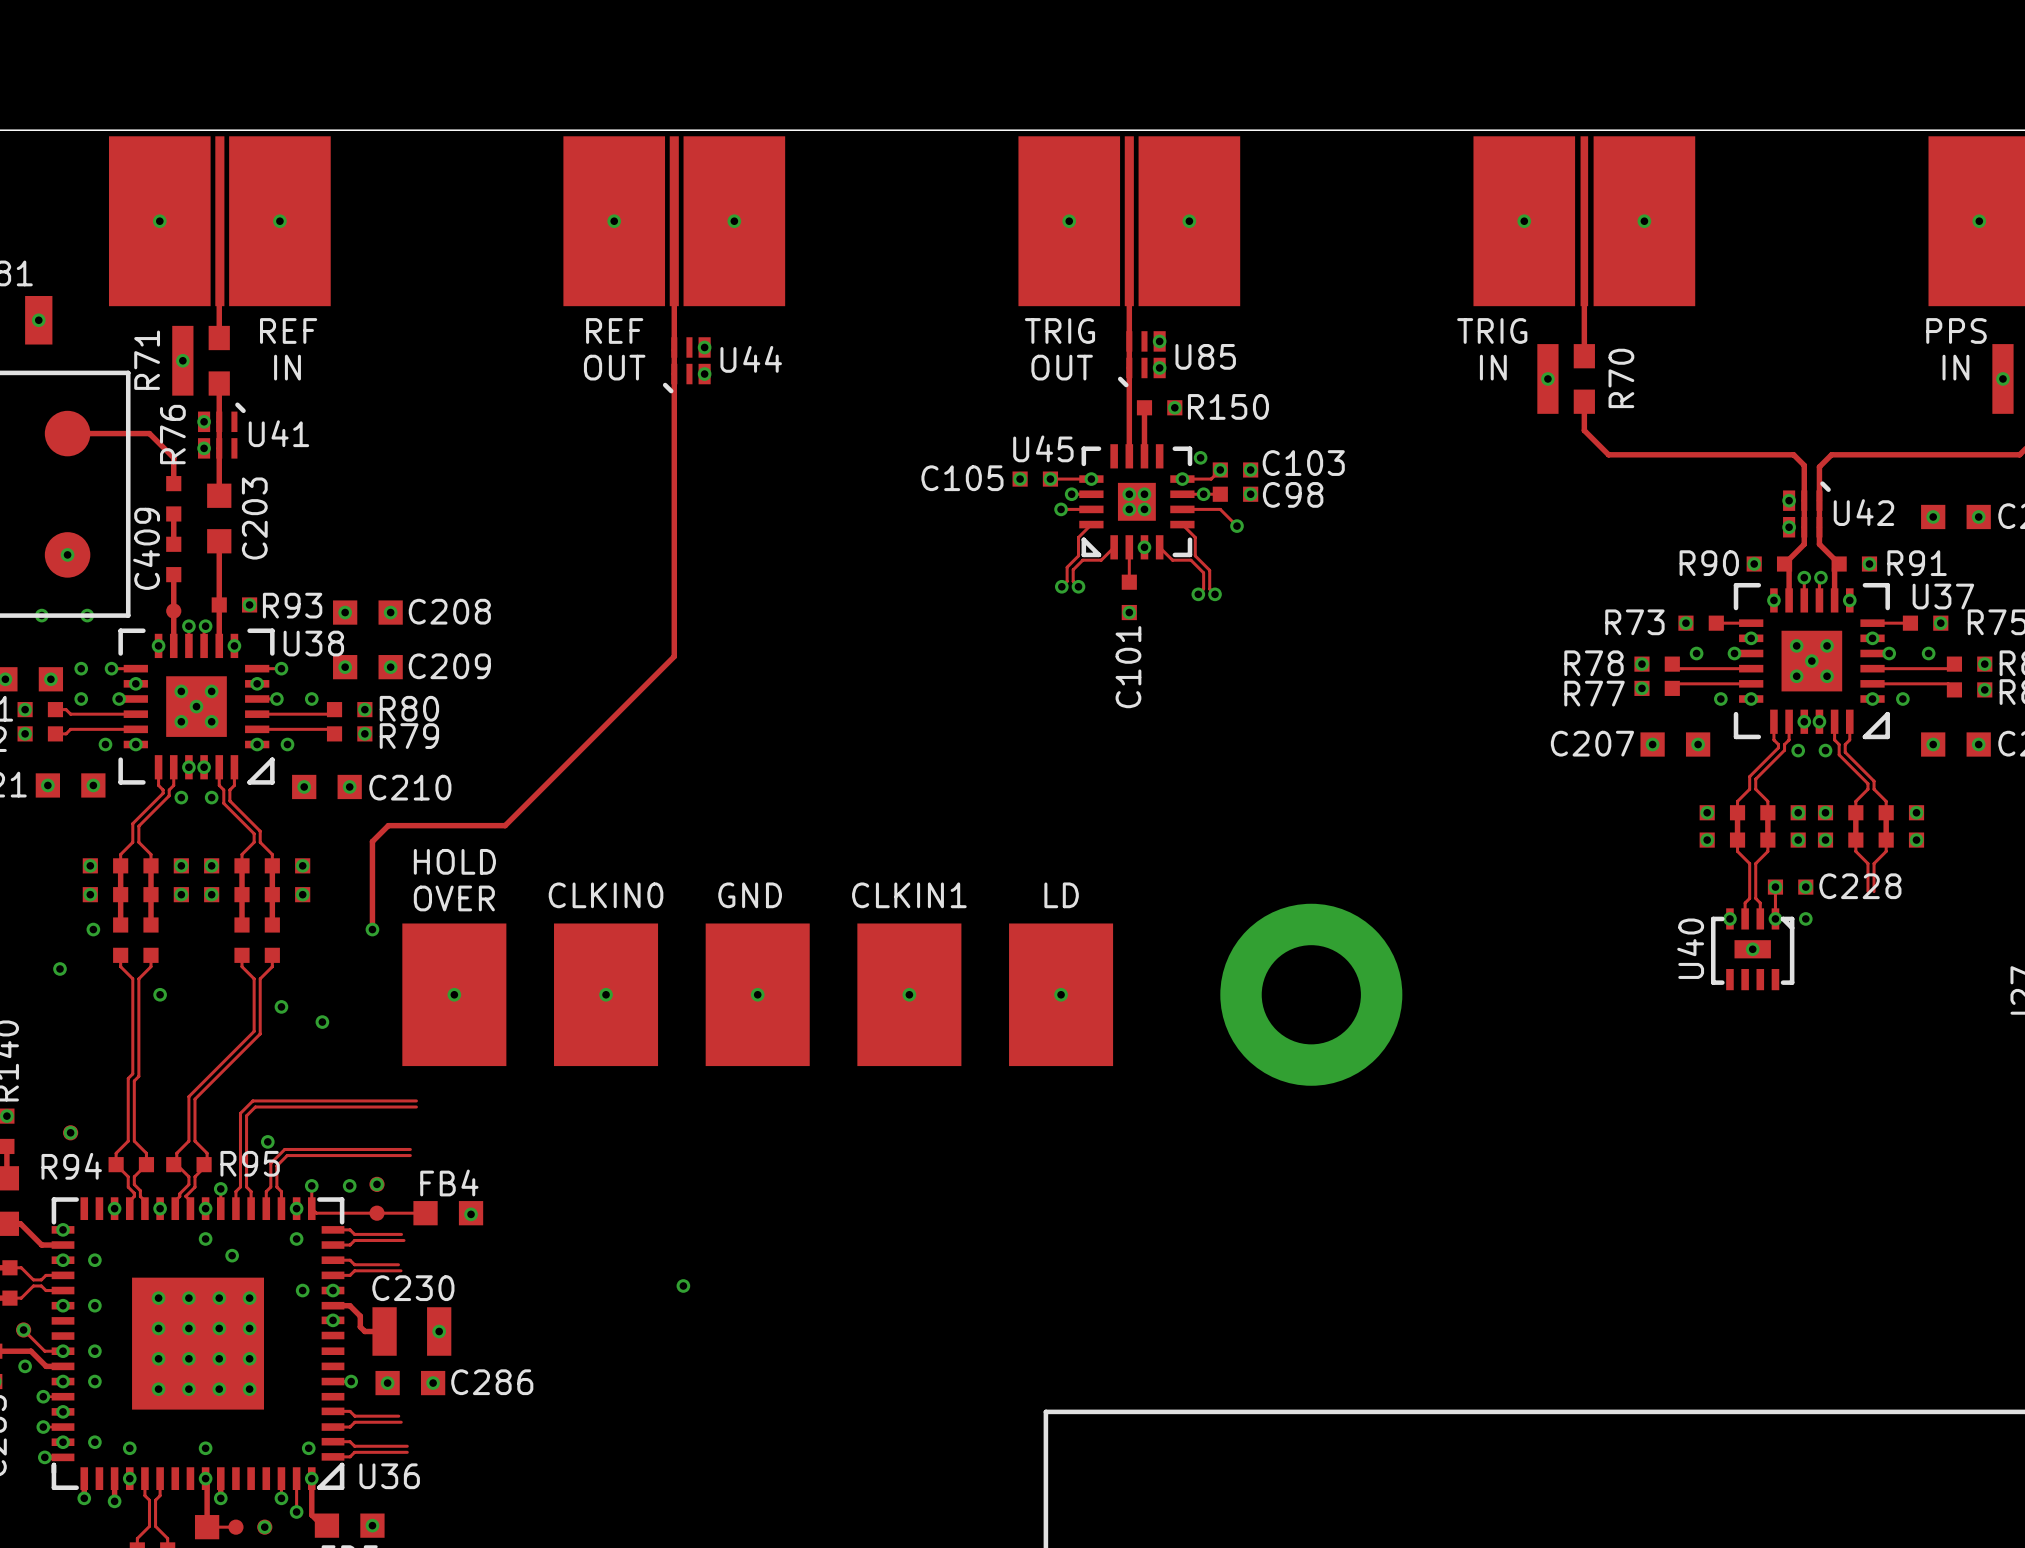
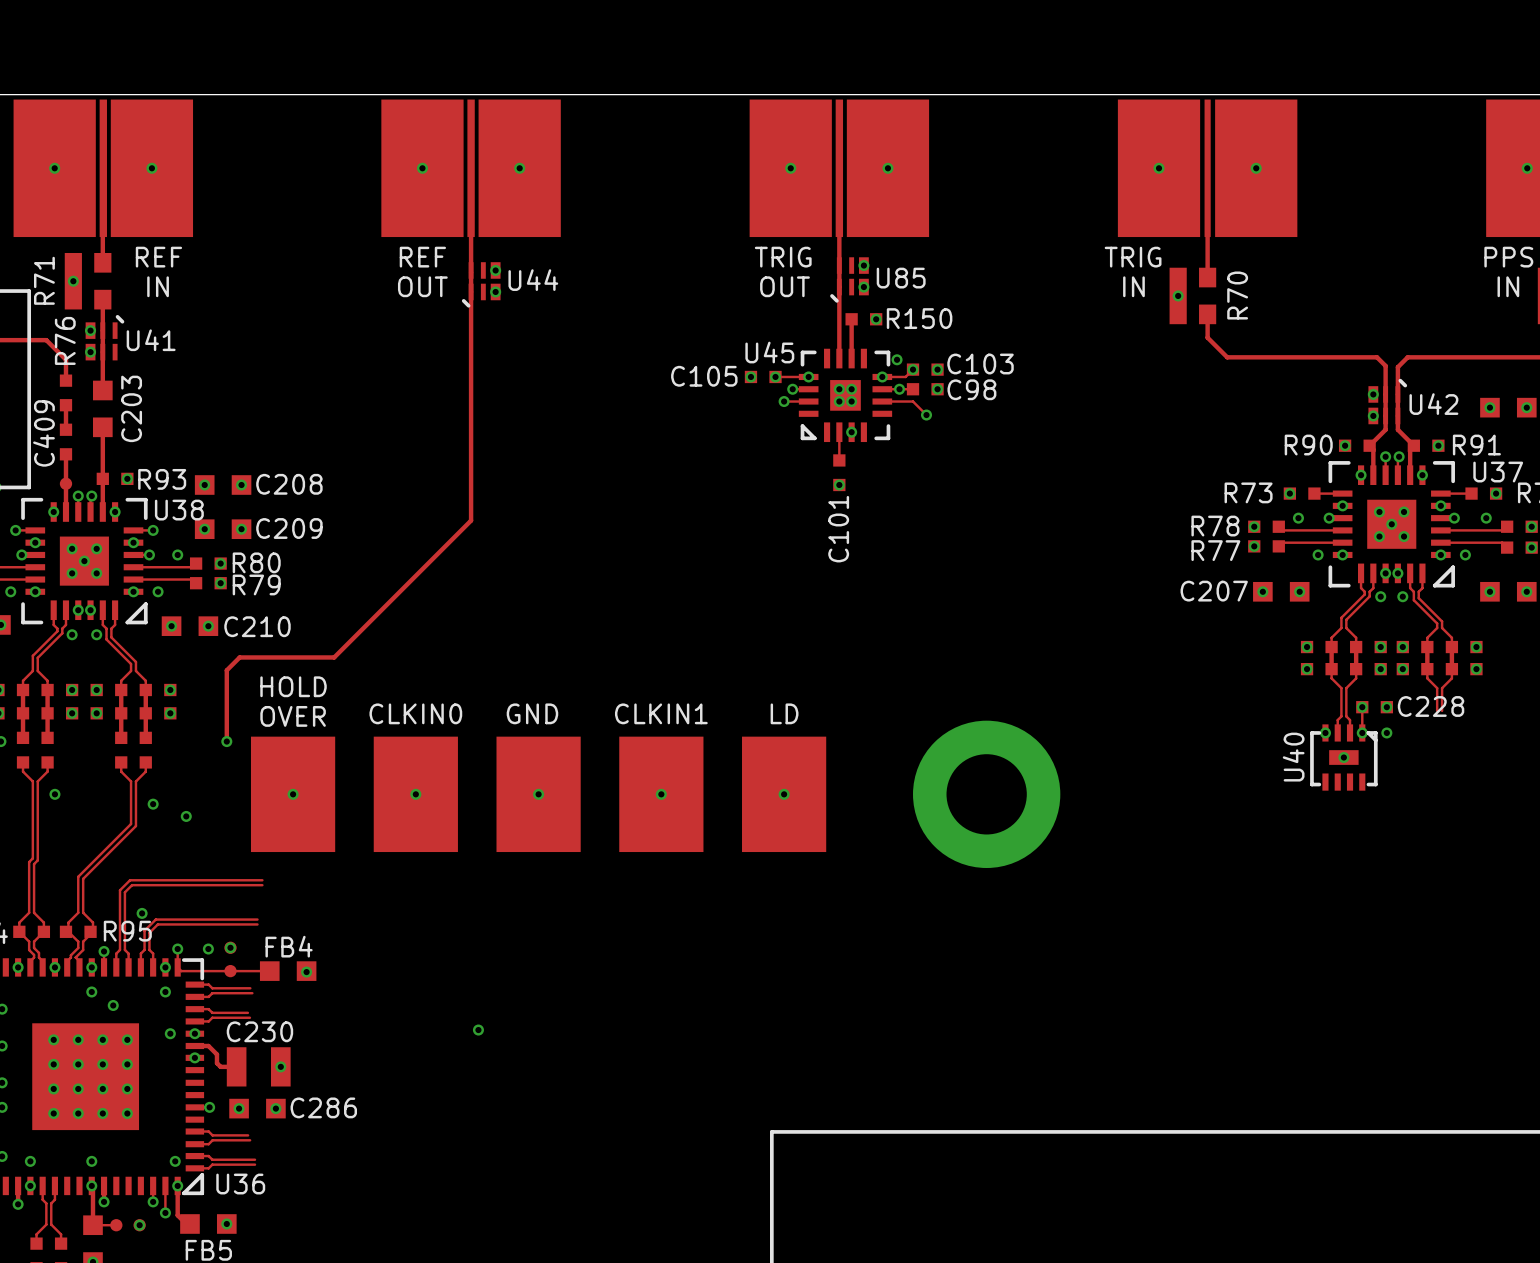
track: (1091, 524) (1078, 537) (1078, 555) (1067, 567) (1067, 581) (1061, 586) -> none
track: (1182, 524) (1195, 537) (1195, 555) (1209, 570) (1209, 589) (1215, 594) -> none
track: (1114, 547) (1101, 560) (1082, 560) (1073, 569) (1073, 581) (1078, 586) -> none
track: (1159, 547) (1172, 560) (1190, 560) (1203, 572) (1203, 589) (1198, 594) -> none
via: (1061, 586) -> none
via: (1078, 586) -> none
via: (1198, 594) -> none
via: (1215, 594) -> none

